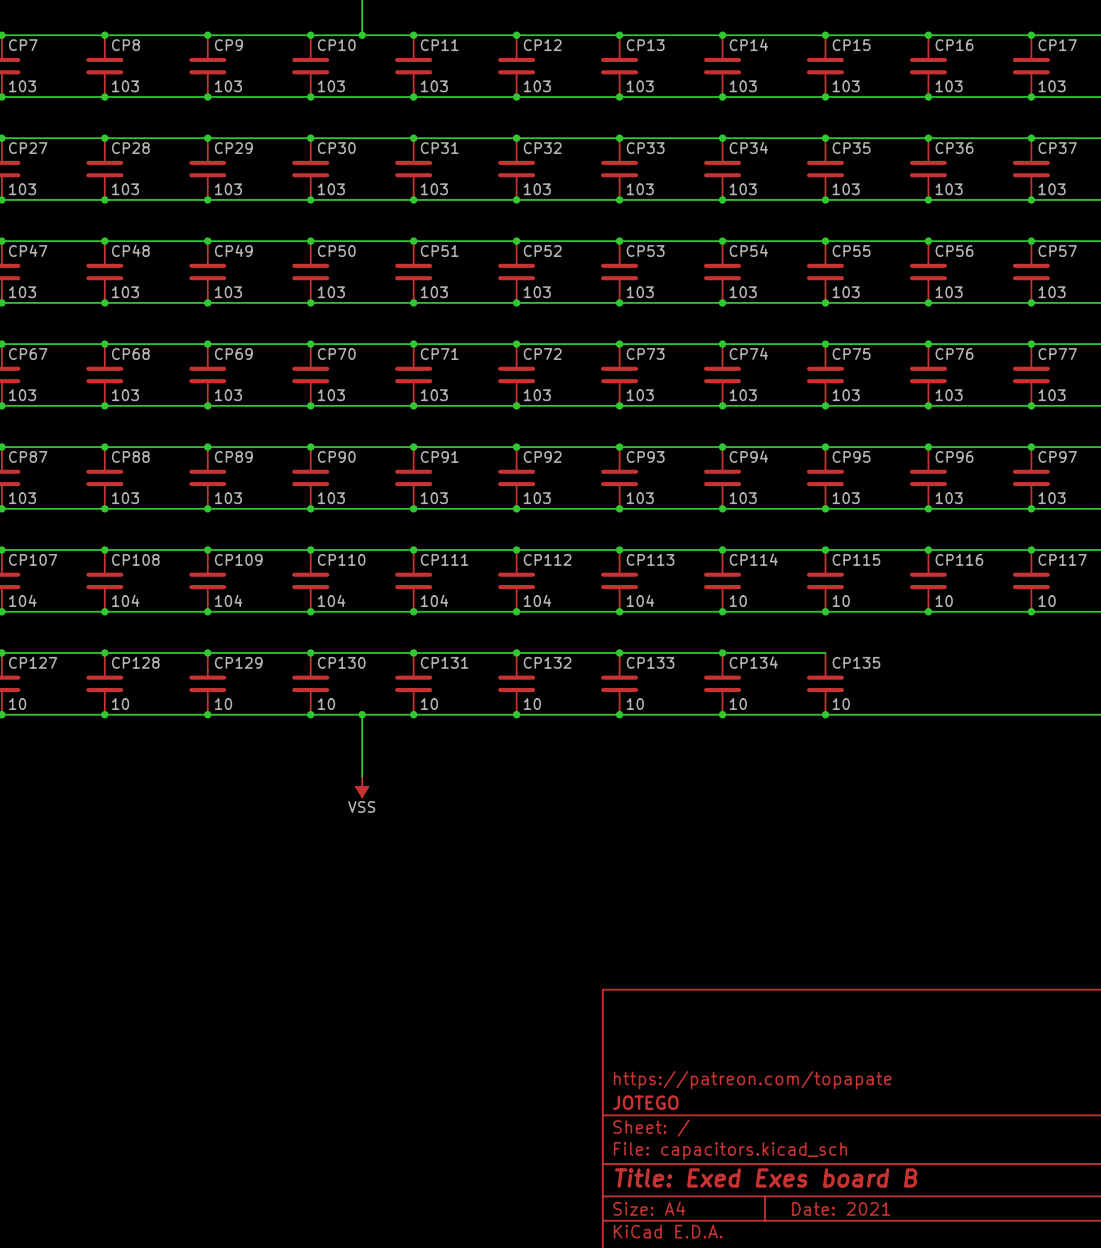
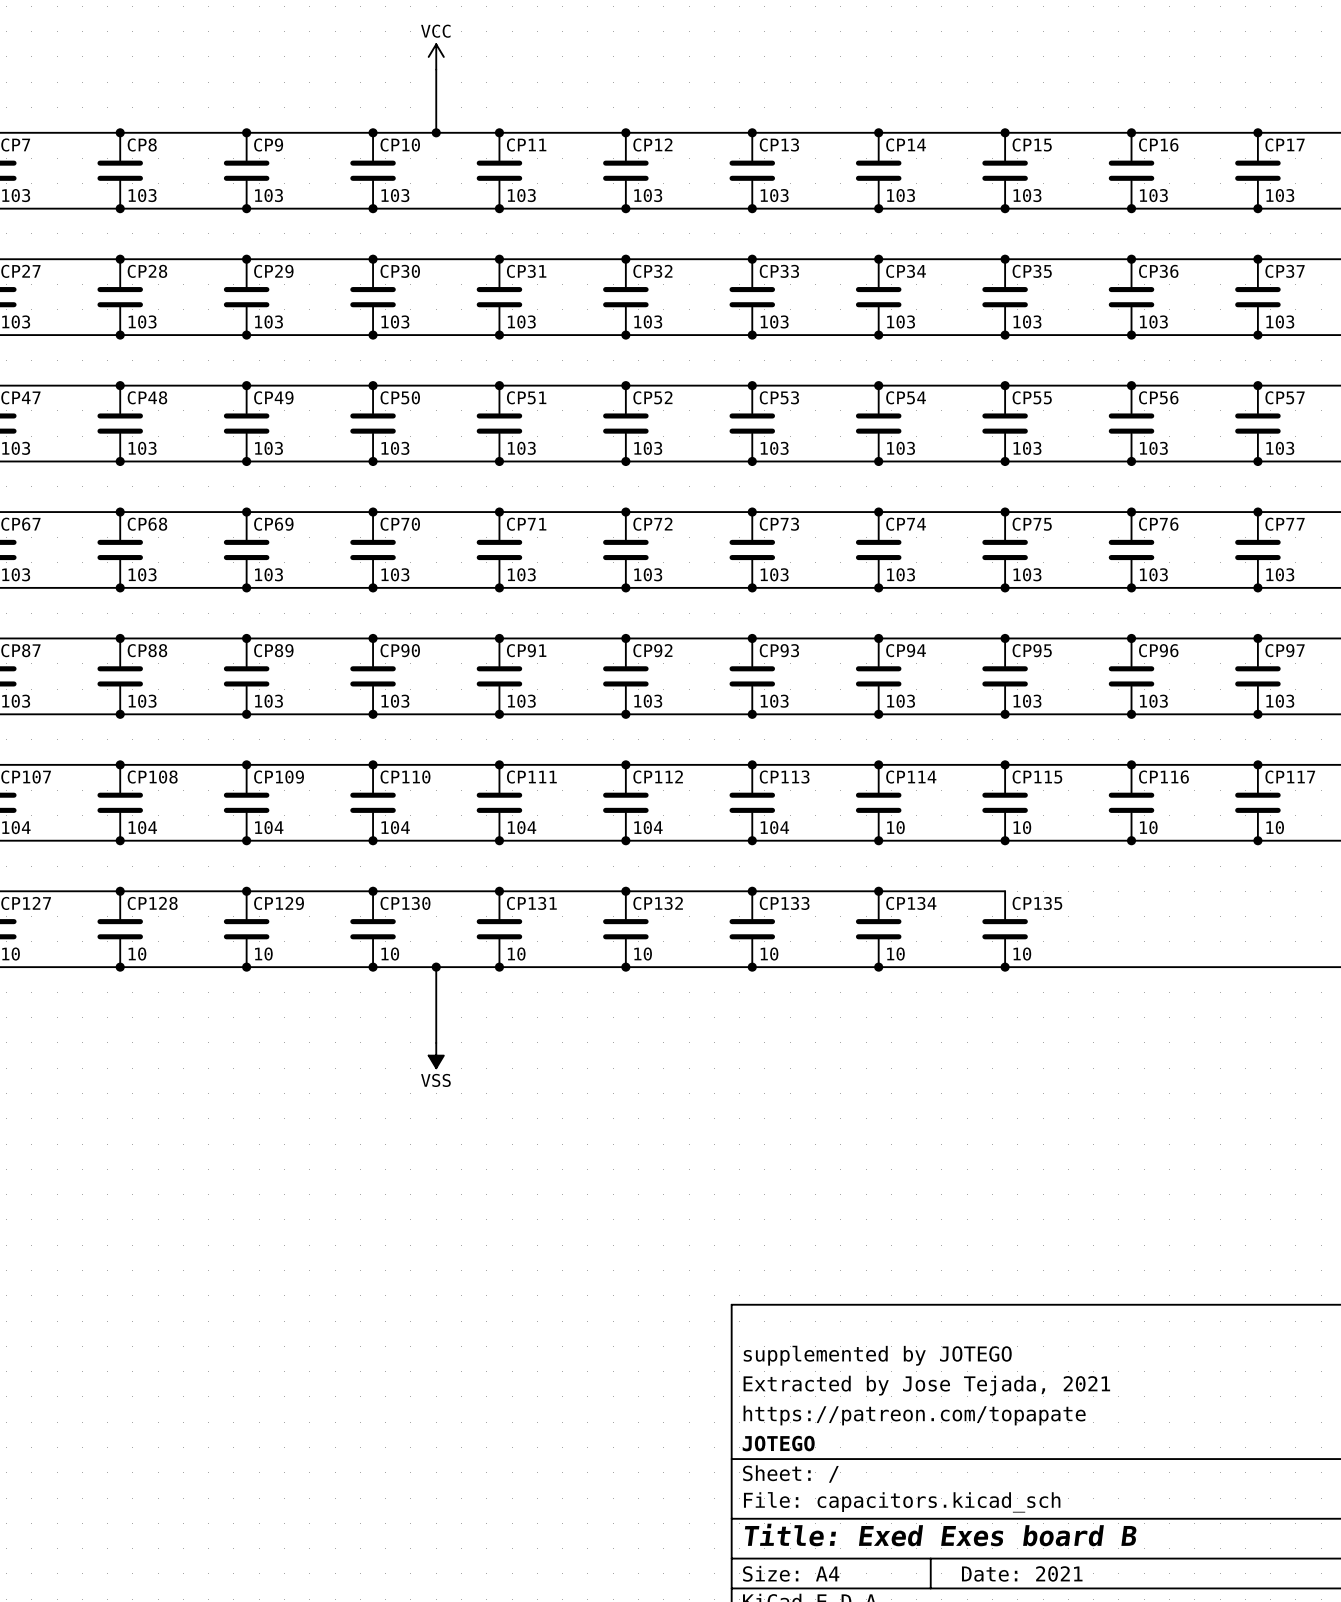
title block: none -> supplemented by JOTEGO (877, 1355)
title block: none -> Extracted by Jose Tejada, 2021 (926, 1385)

